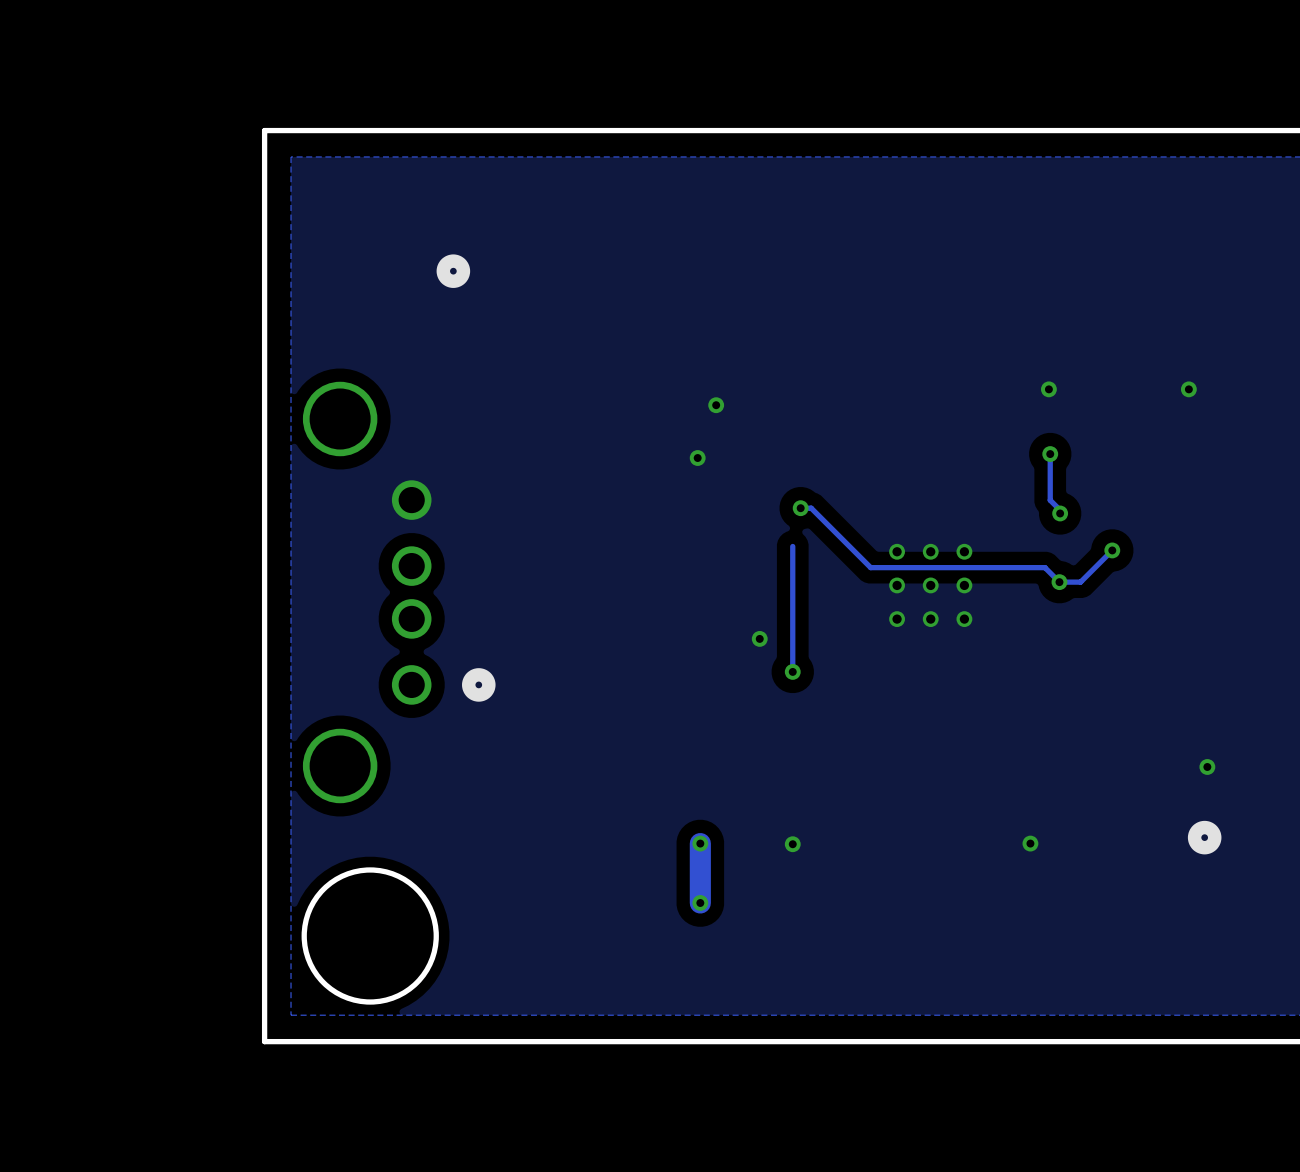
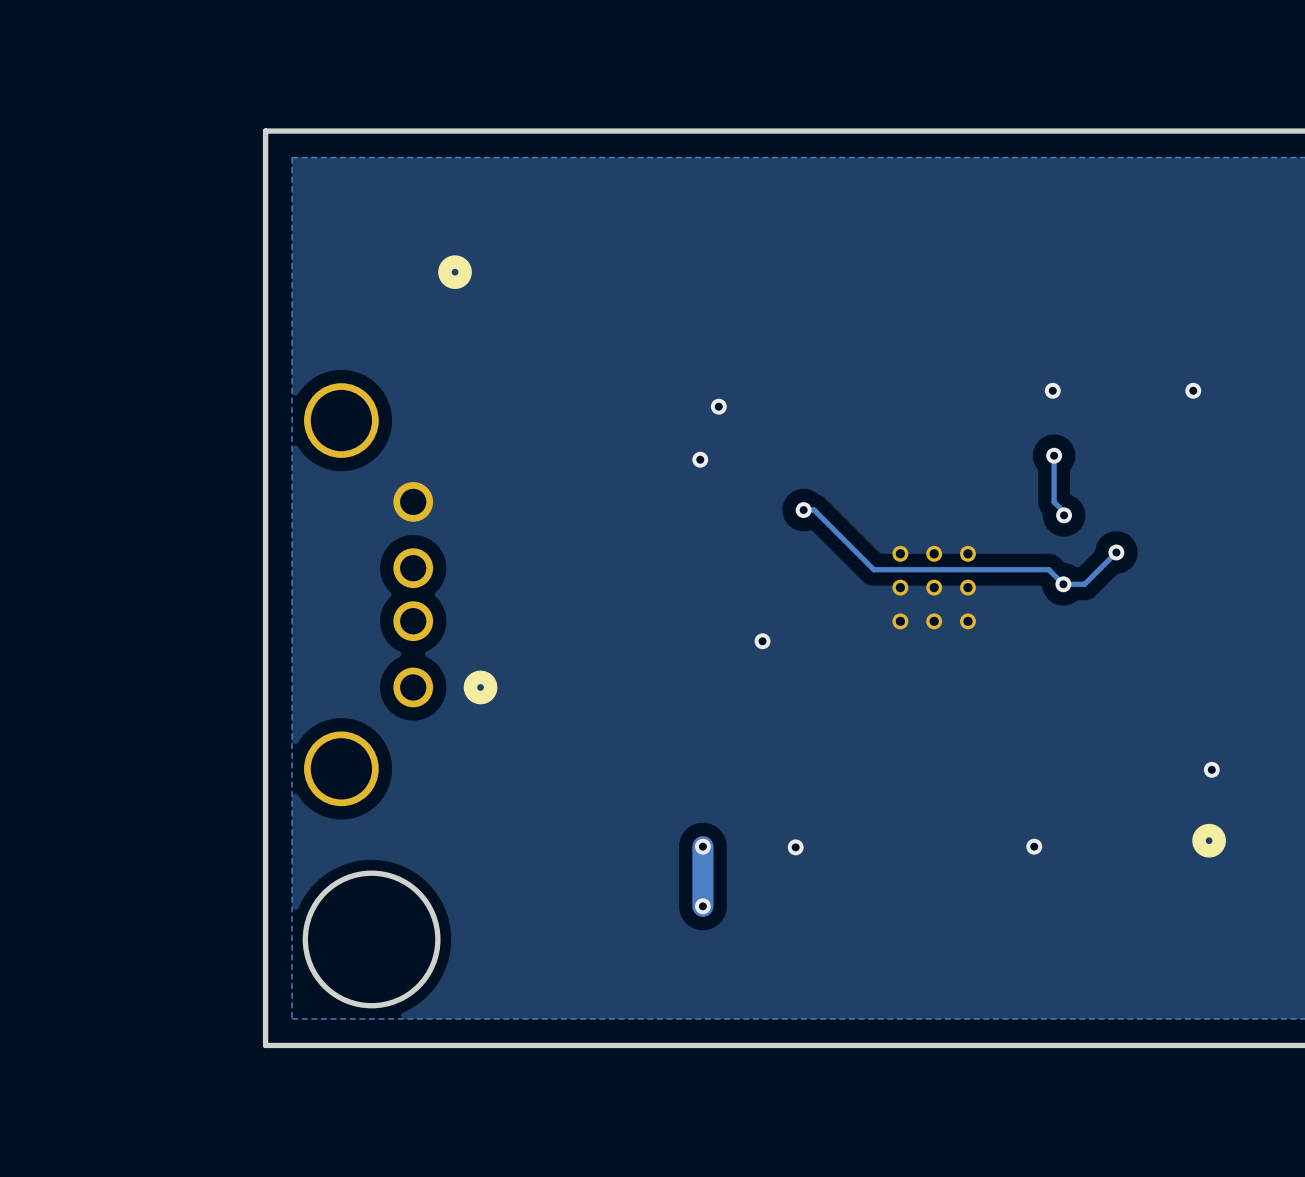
track: (792, 546) (792, 671) -> none
via: (792, 671) -> none

